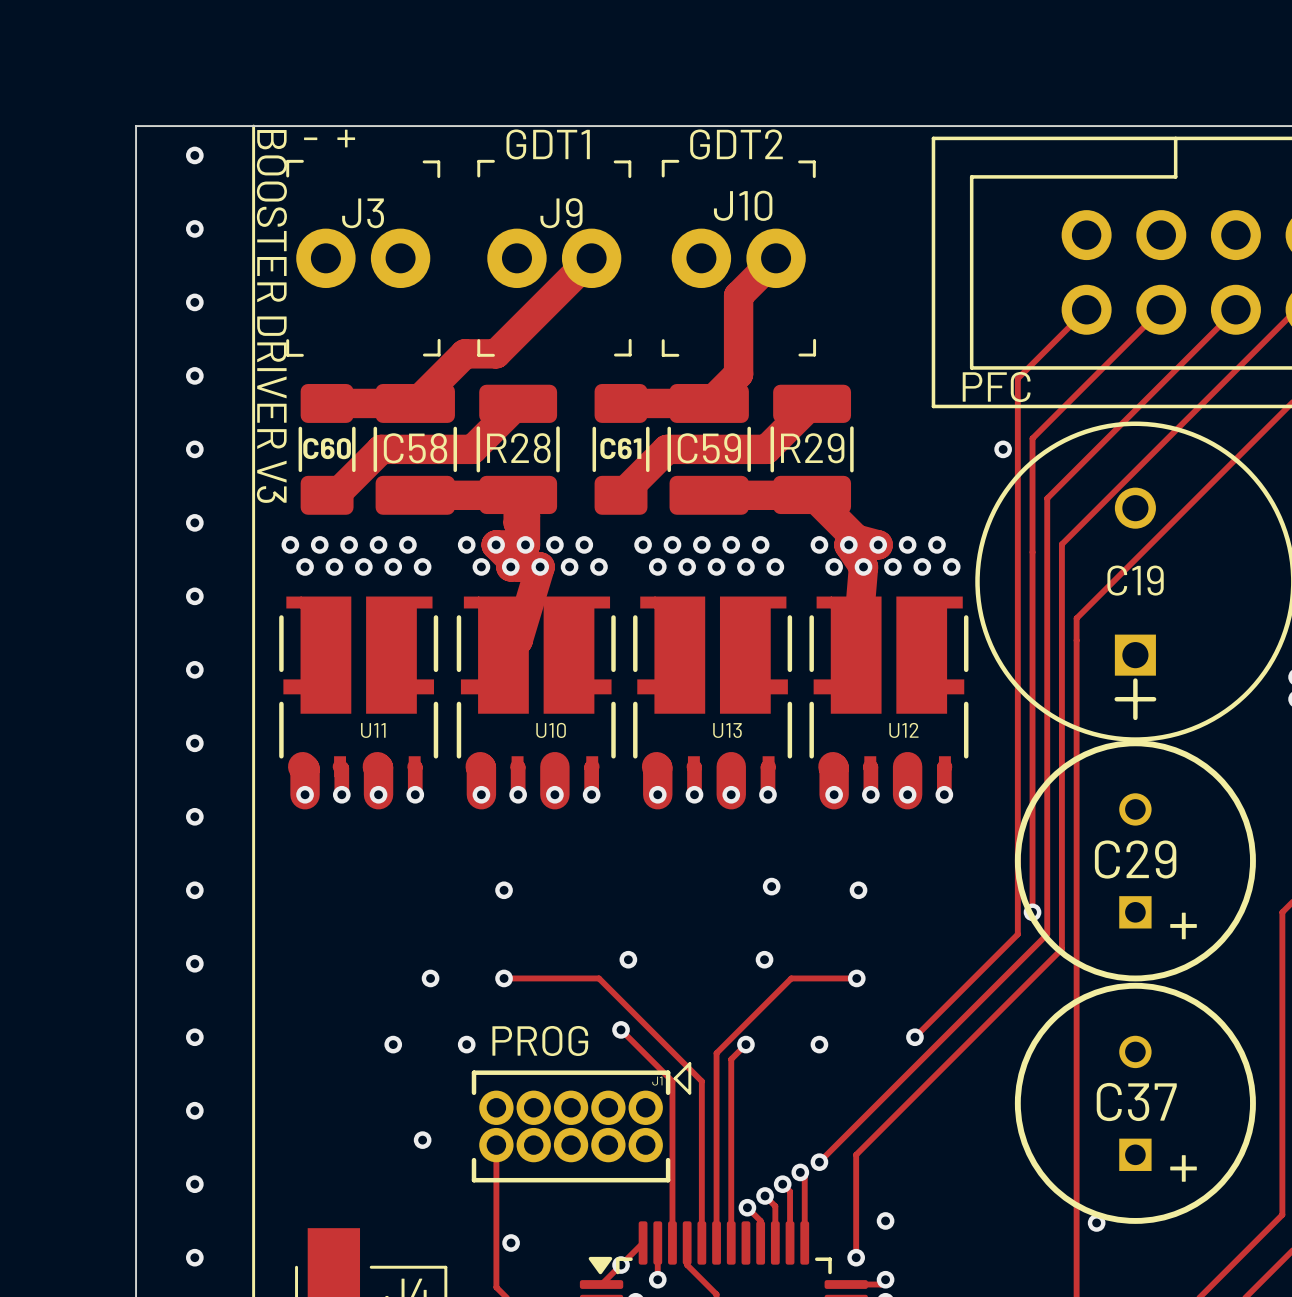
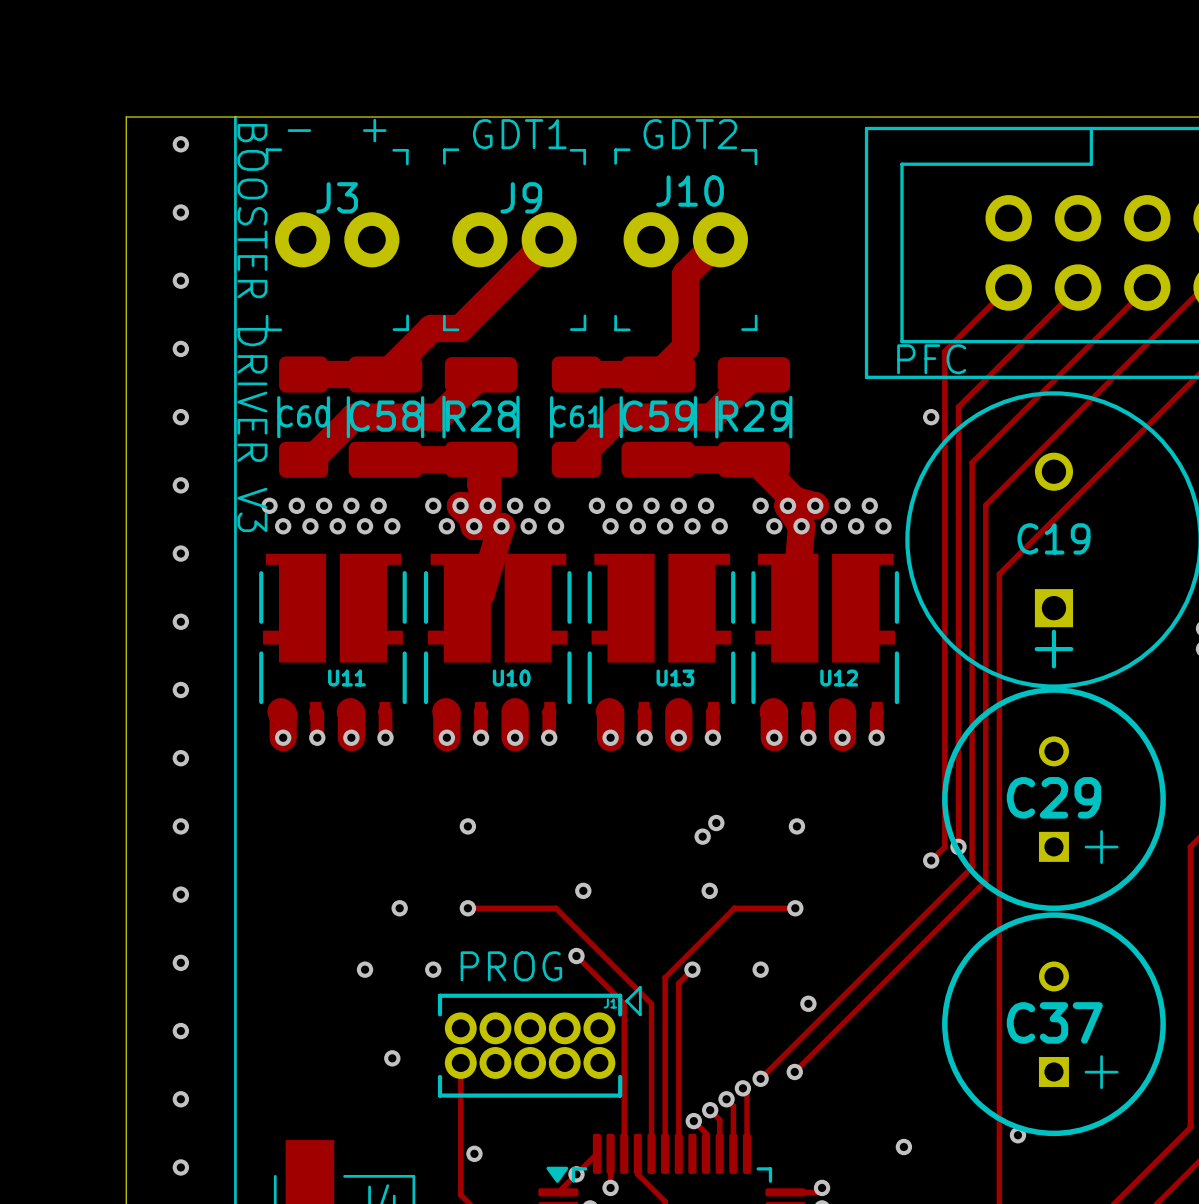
via: none -> (702, 836)
track: (1017, 912) (1017, 934) (914, 1037) -> (944, 846) (931, 860)
via: none -> (931, 860)
via position: (914, 1037) -> (808, 1003)
track: (856, 1154) (856, 1257) -> none
via: none -> (794, 1071)
via: (885, 1220) -> none
via: none -> (903, 1147)
via: (856, 1257) -> none

